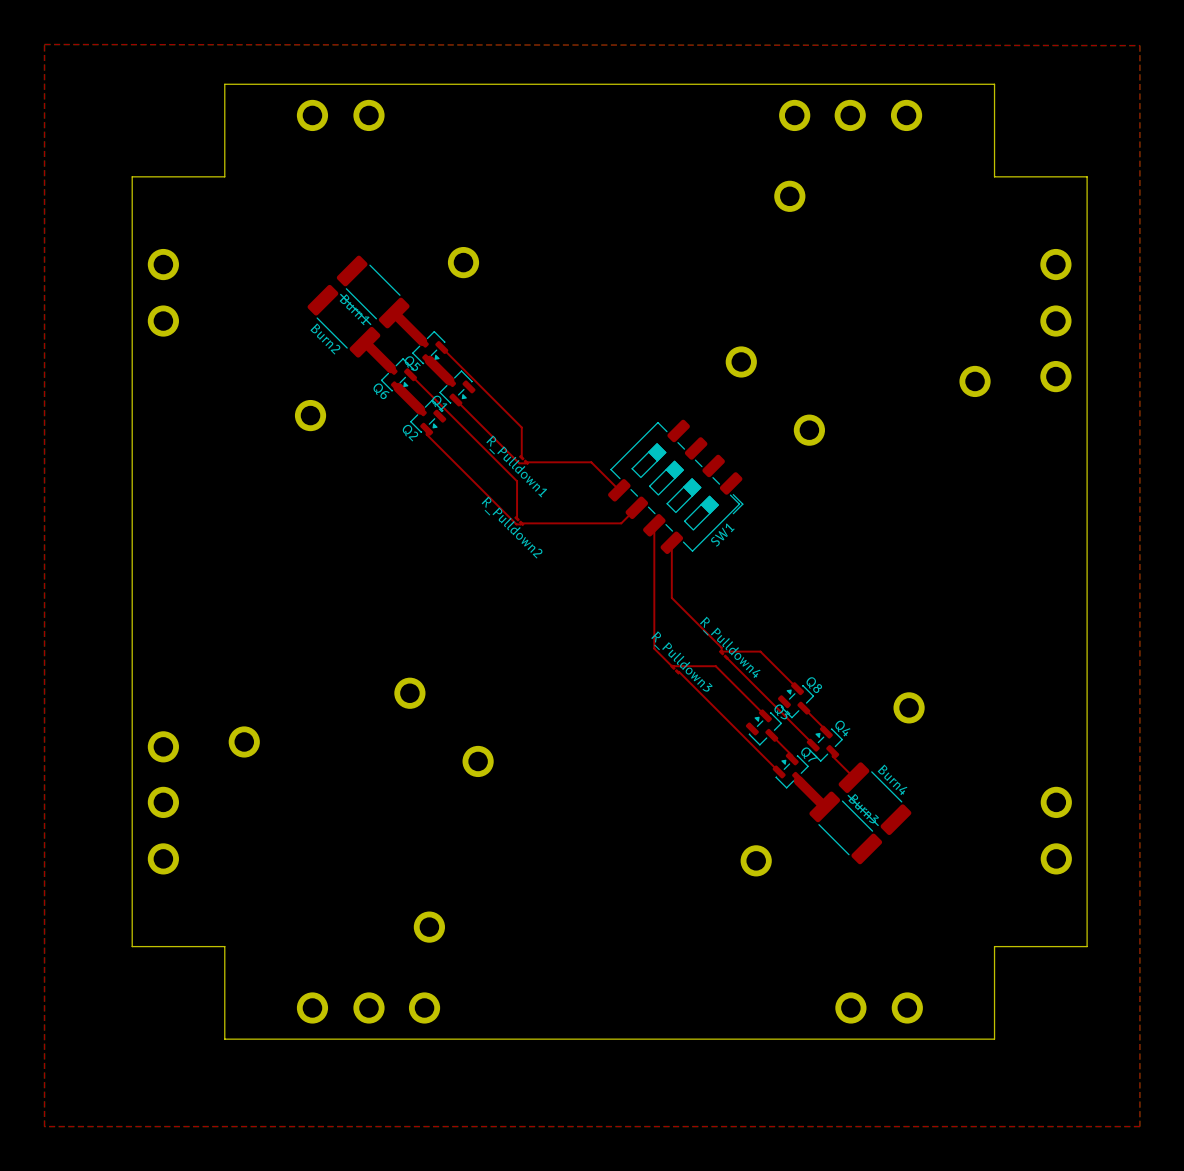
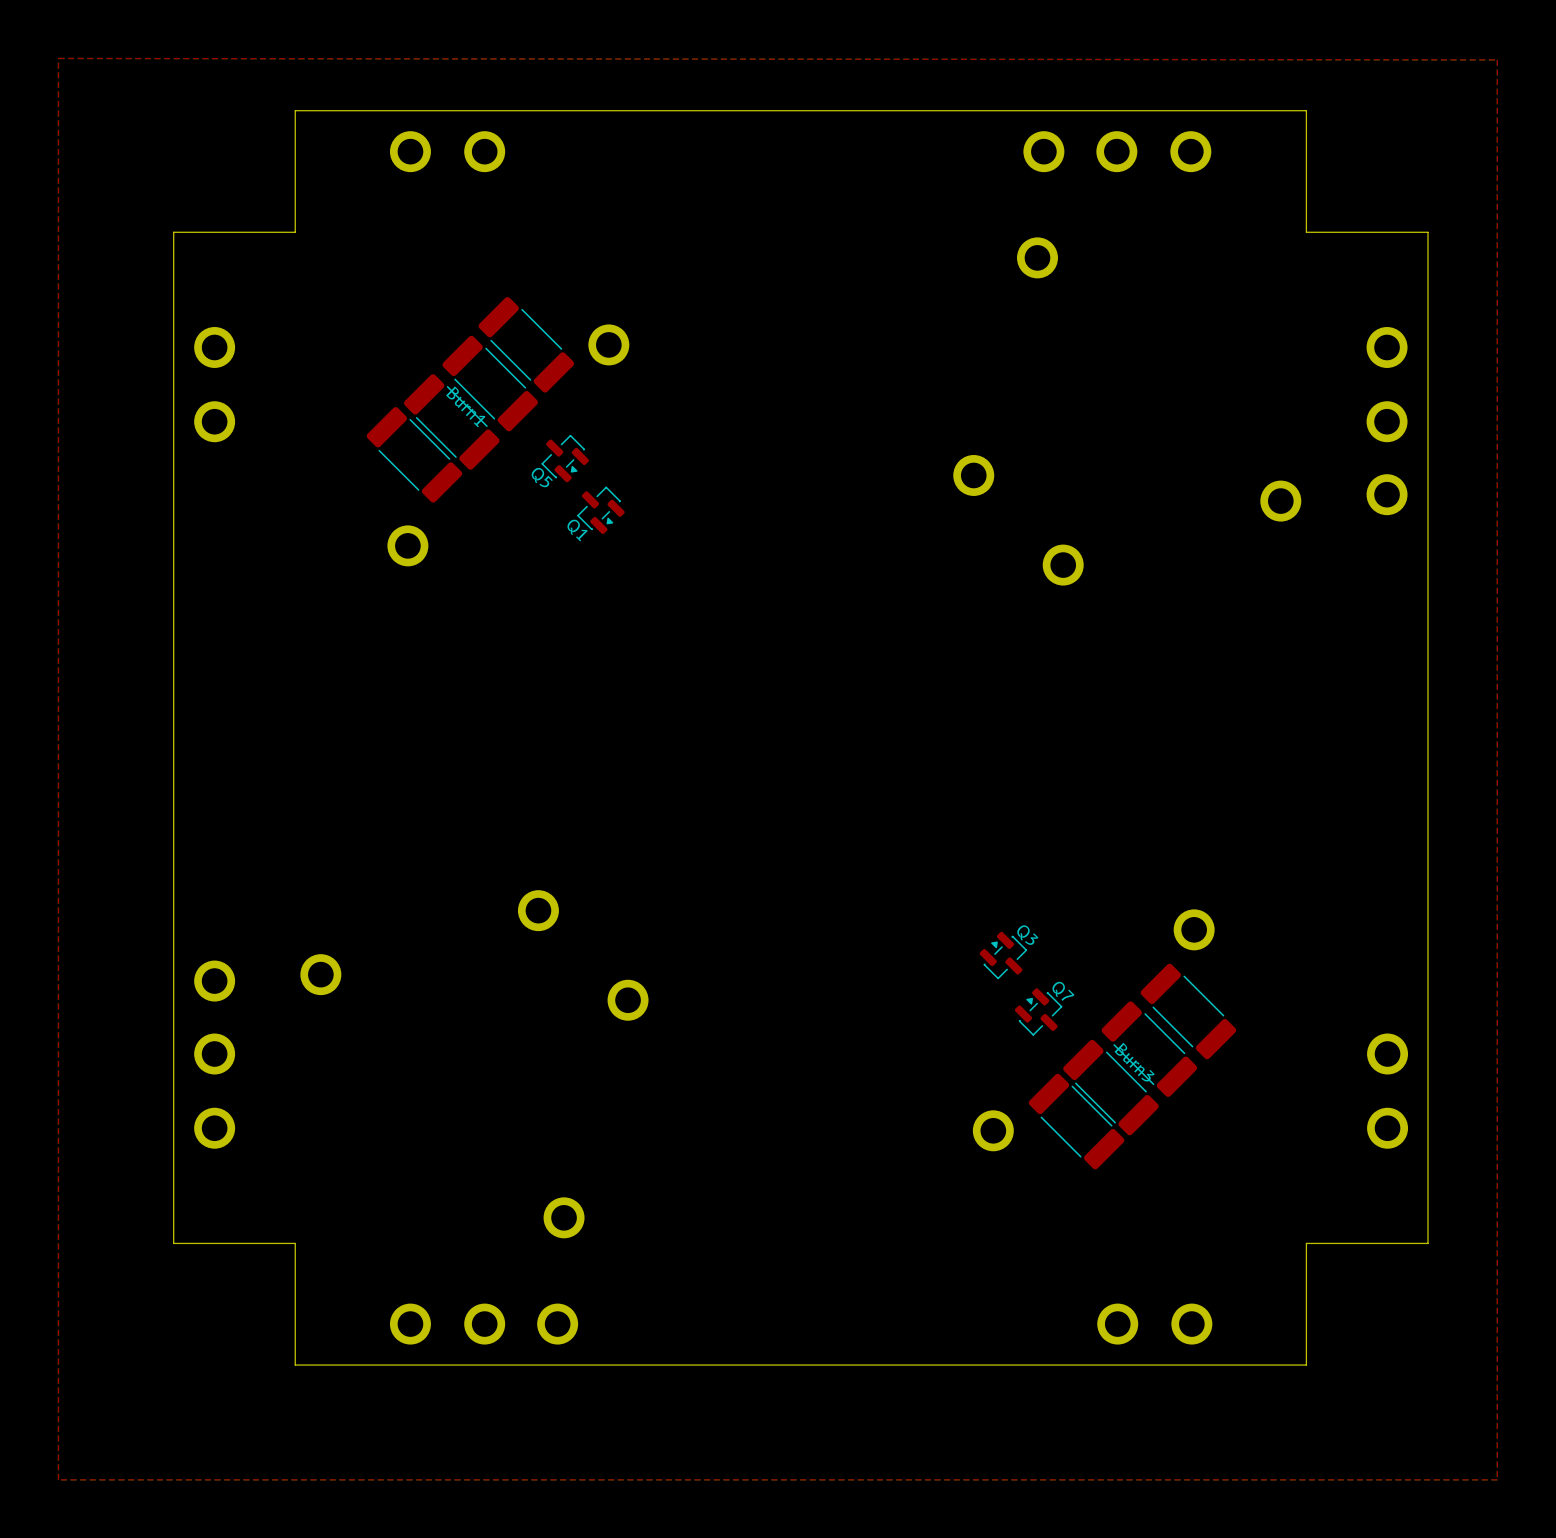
part: none -> (526, 344)
top track: (394, 313) (422, 341) -> none
Burn2 name: Burn2 (325, 338) -> none
top track: (364, 342) (391, 368) -> none
part: none -> (414, 454)
top track: (441, 347) (521, 427) (521, 457) -> none
top track: (428, 360) (449, 380) -> none
top track: (410, 374) (517, 481) (517, 518) -> none
Q6: (399, 376) -> none
top track: (397, 387) (420, 409) -> none
top track: (455, 400) (519, 463) (591, 462) (619, 490) -> none
Q2: (428, 417) -> none
top track: (426, 429) (426, 434) (516, 524) (621, 523) (636, 507) -> none
R_Pulldown1: (524, 459) -> none
SW1: (675, 486) -> none
R_Pulldown2: (519, 521) -> none
top track: (654, 525) (654, 648) (672, 667) (715, 666) (765, 715) -> none
top track: (671, 542) (671, 597) (721, 647) (721, 652) (760, 651) (797, 688) -> none
R_Pulldown4: (723, 654) -> none
top track: (726, 657) (813, 745) -> none
R_Pulldown3: (675, 669) -> none
top track: (677, 671) (779, 771) -> none
Q8: (795, 700) -> none
top track: (803, 708) (826, 732) -> none
top track: (771, 735) (792, 755) (792, 758) -> none
Q4: (824, 743) -> none
top track: (832, 751) (832, 756) (853, 777) -> none
part: none -> (1188, 1011)
top track: (798, 778) (798, 780) (824, 806) -> none
Burn4 name: Burn4 (892, 779) -> none
part: none -> (1076, 1121)

